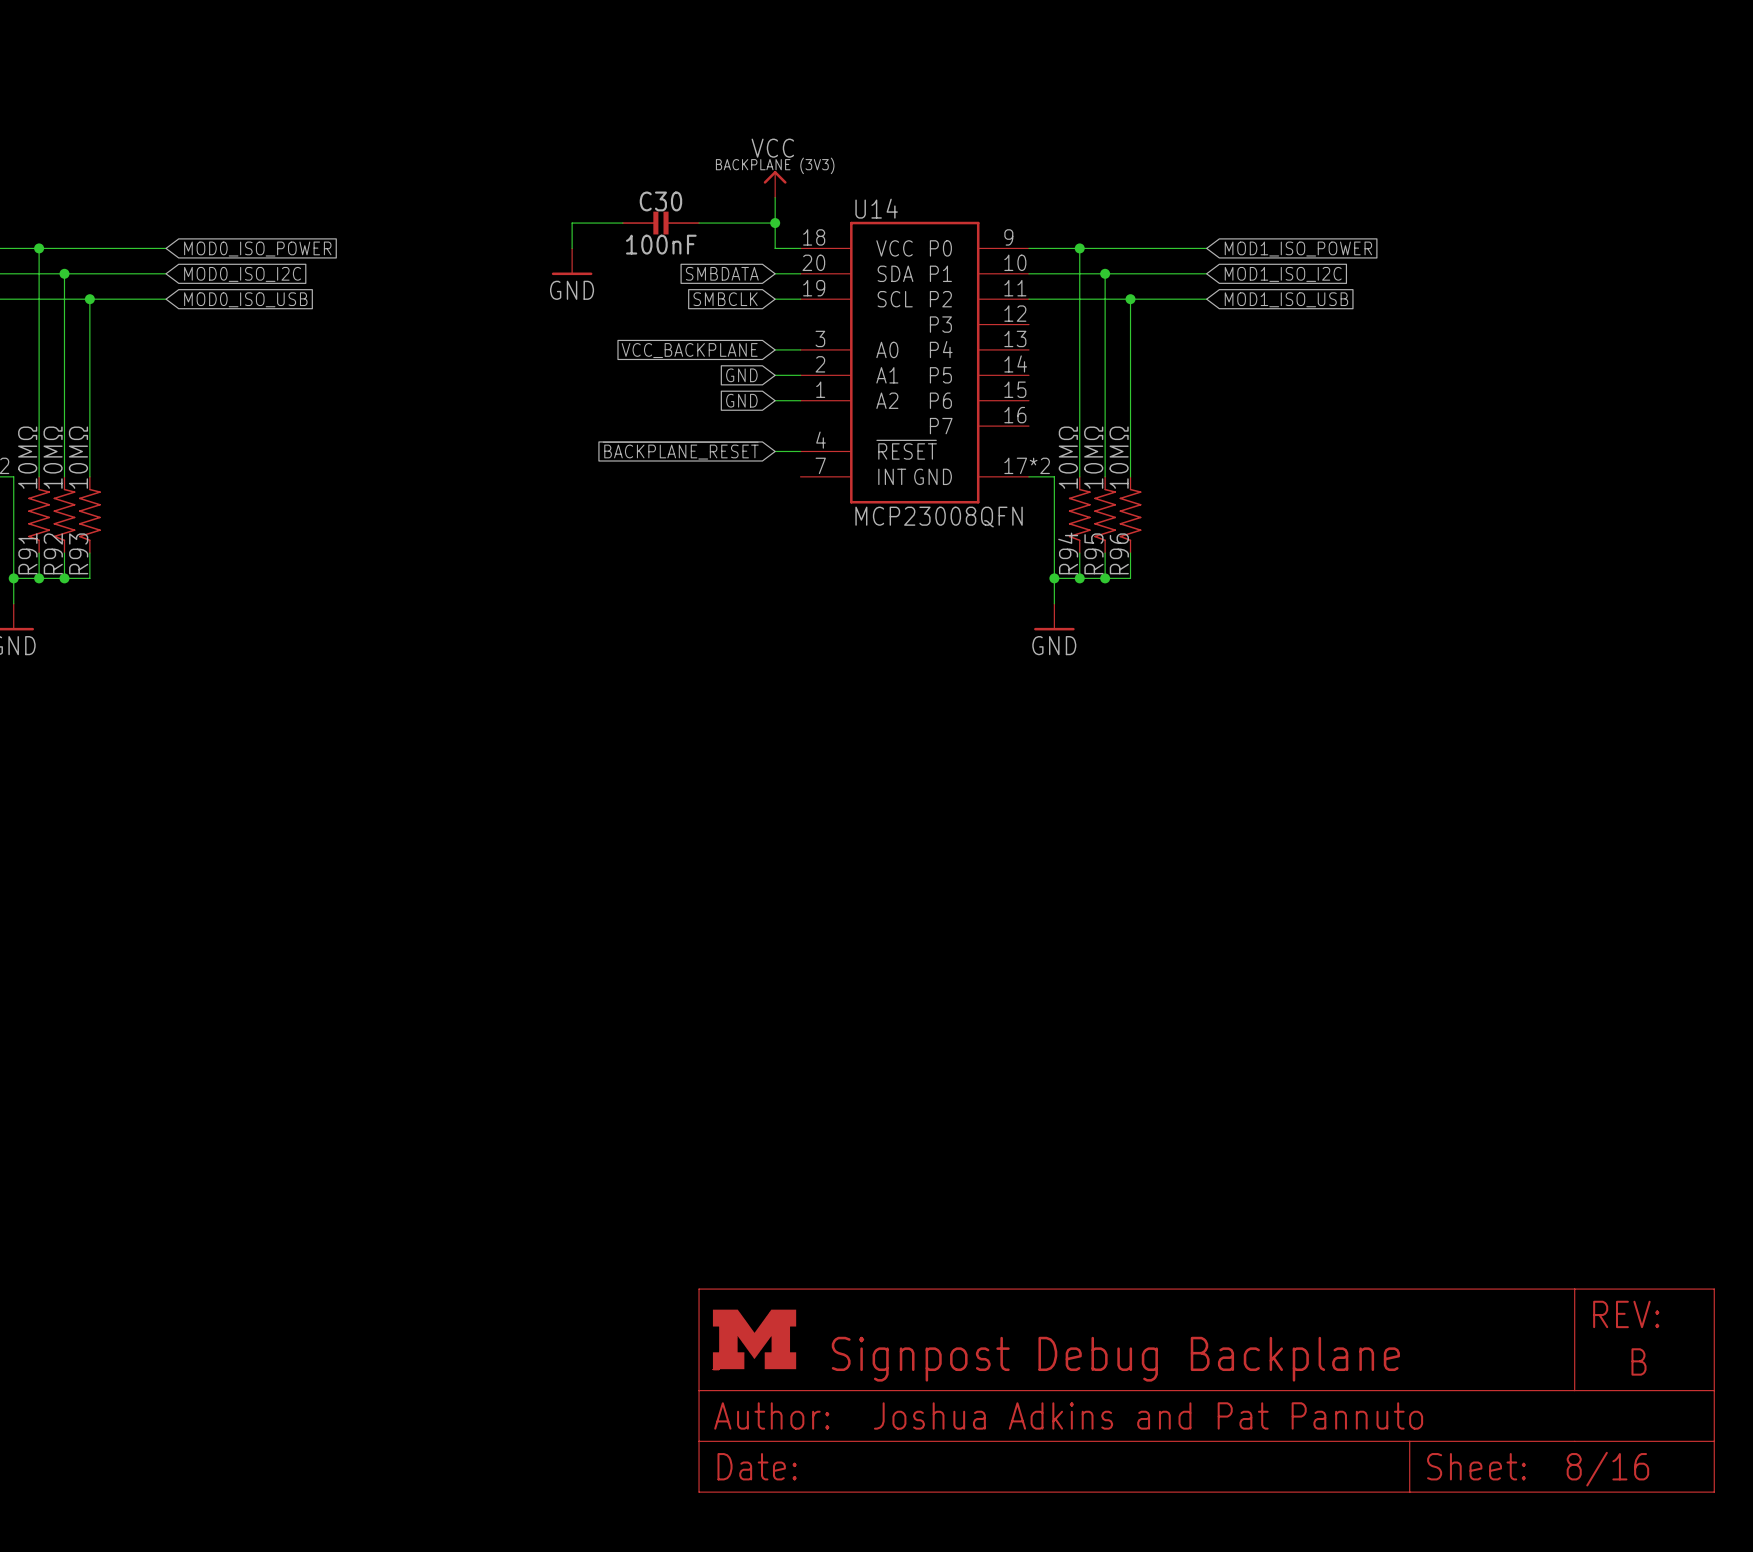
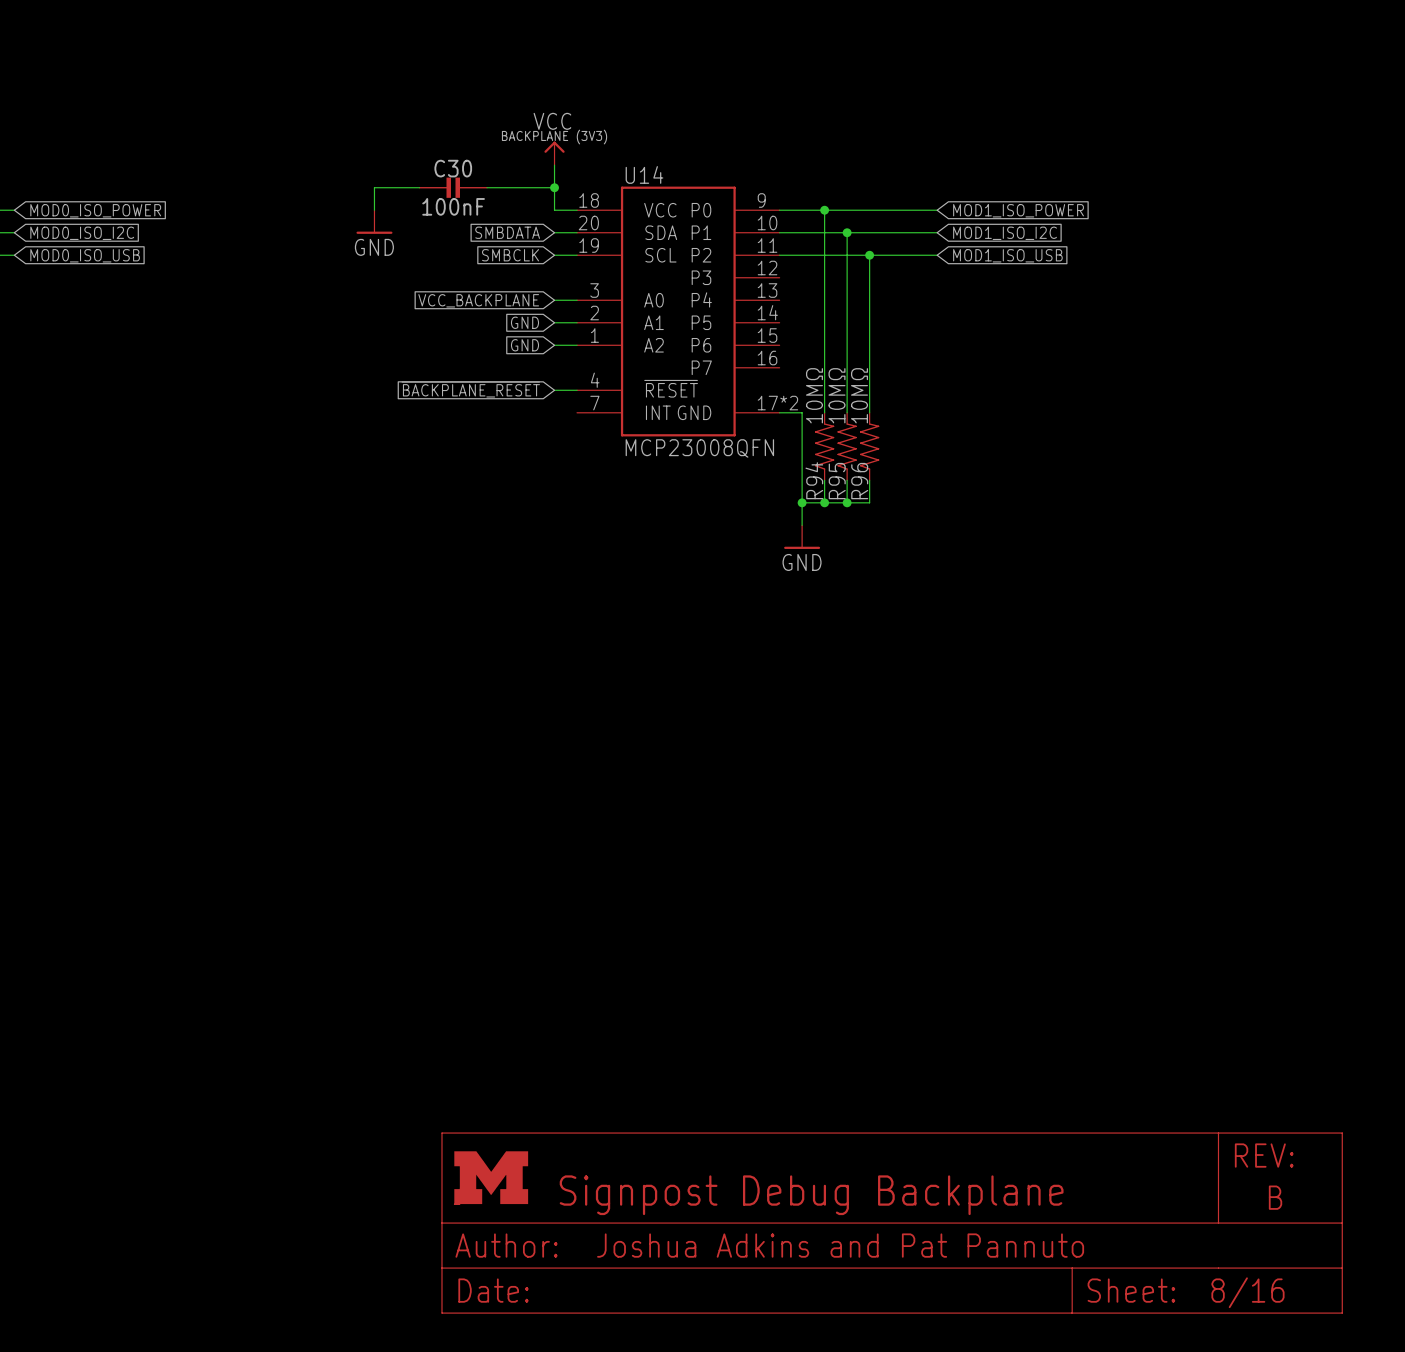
part position: (1206, 1390) -> (892, 1223)

